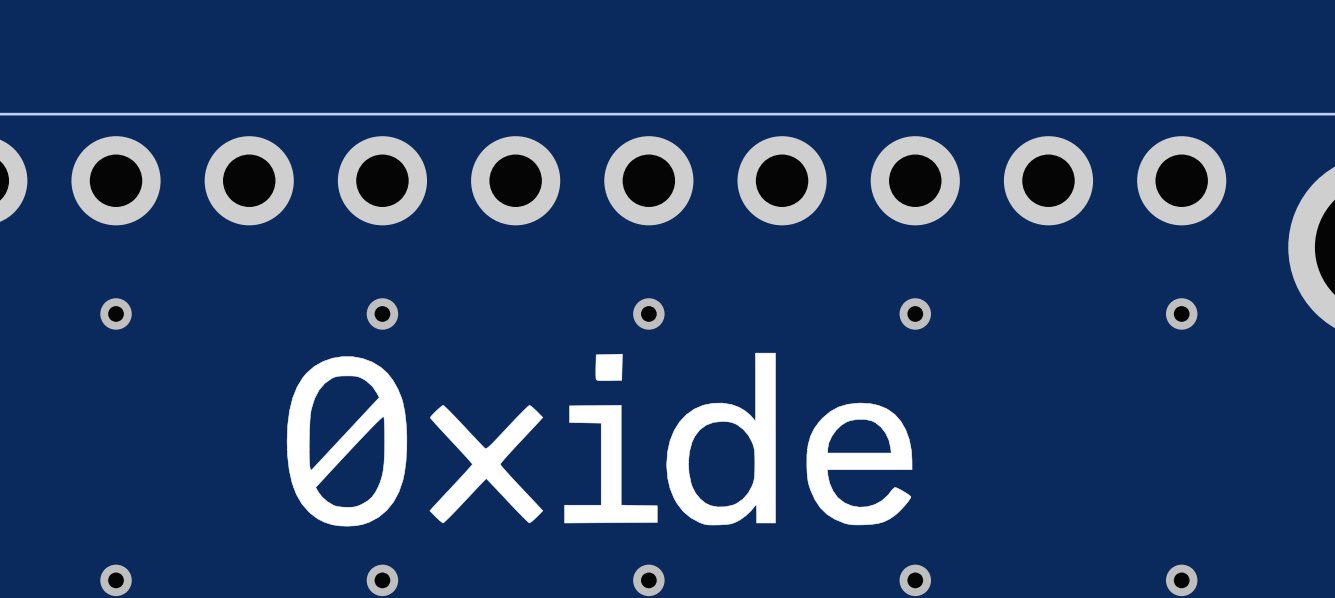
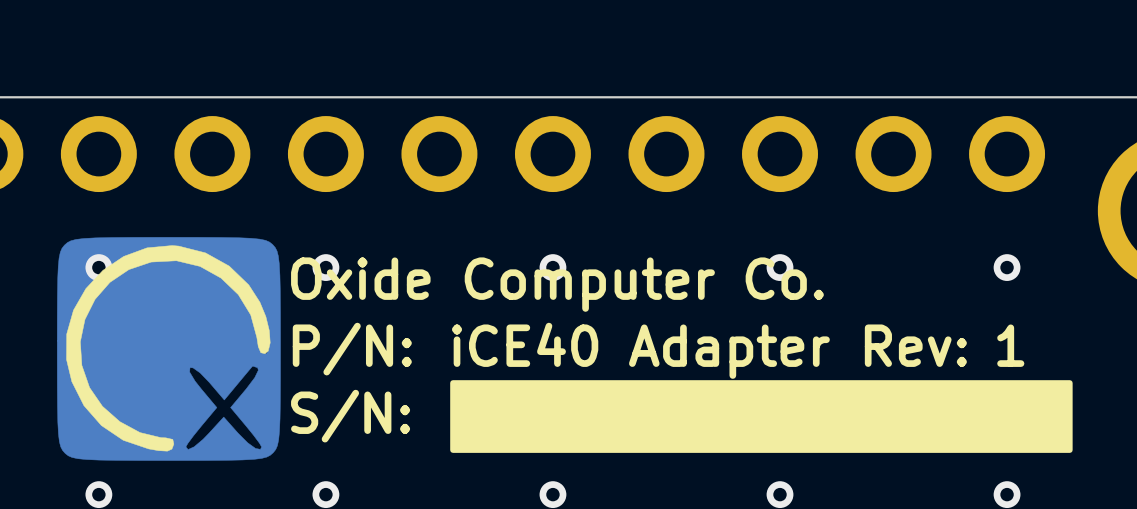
drawing: none -> [57, 237, 1073, 461]
drawing: [286, 352, 913, 527] -> none

